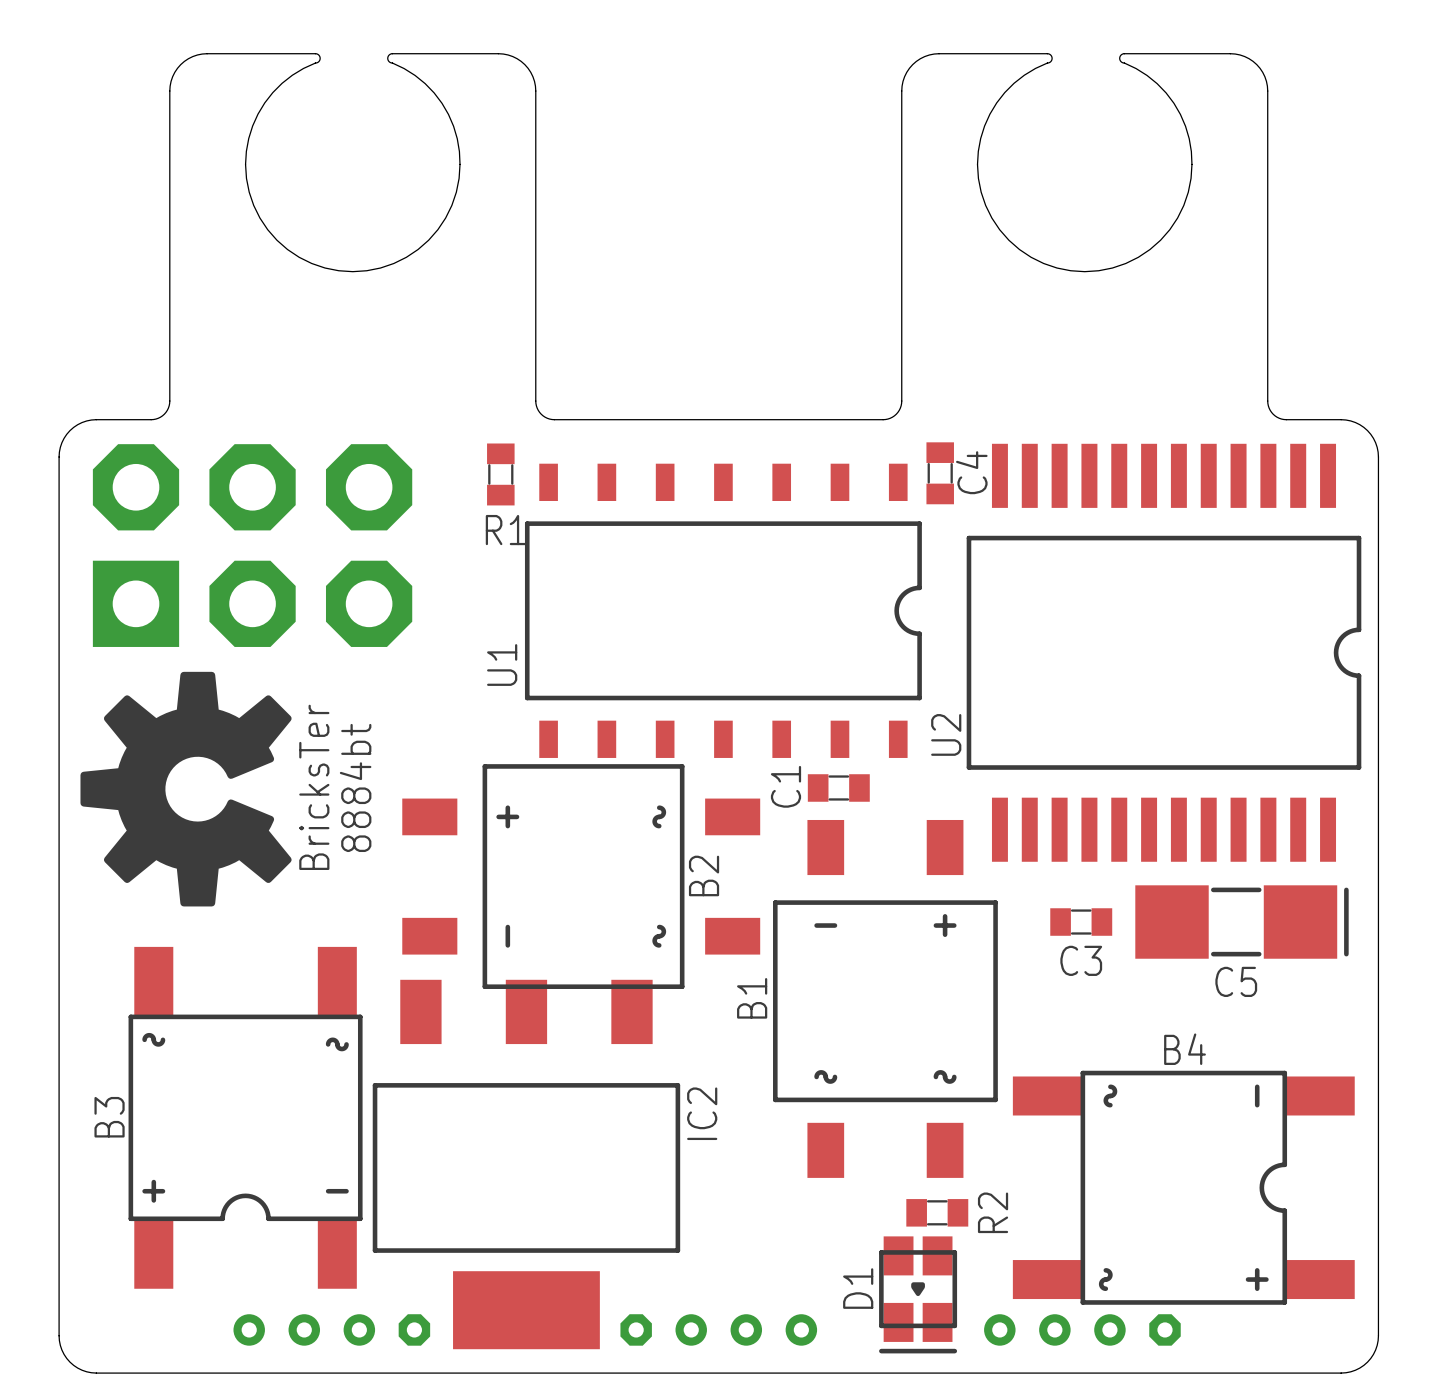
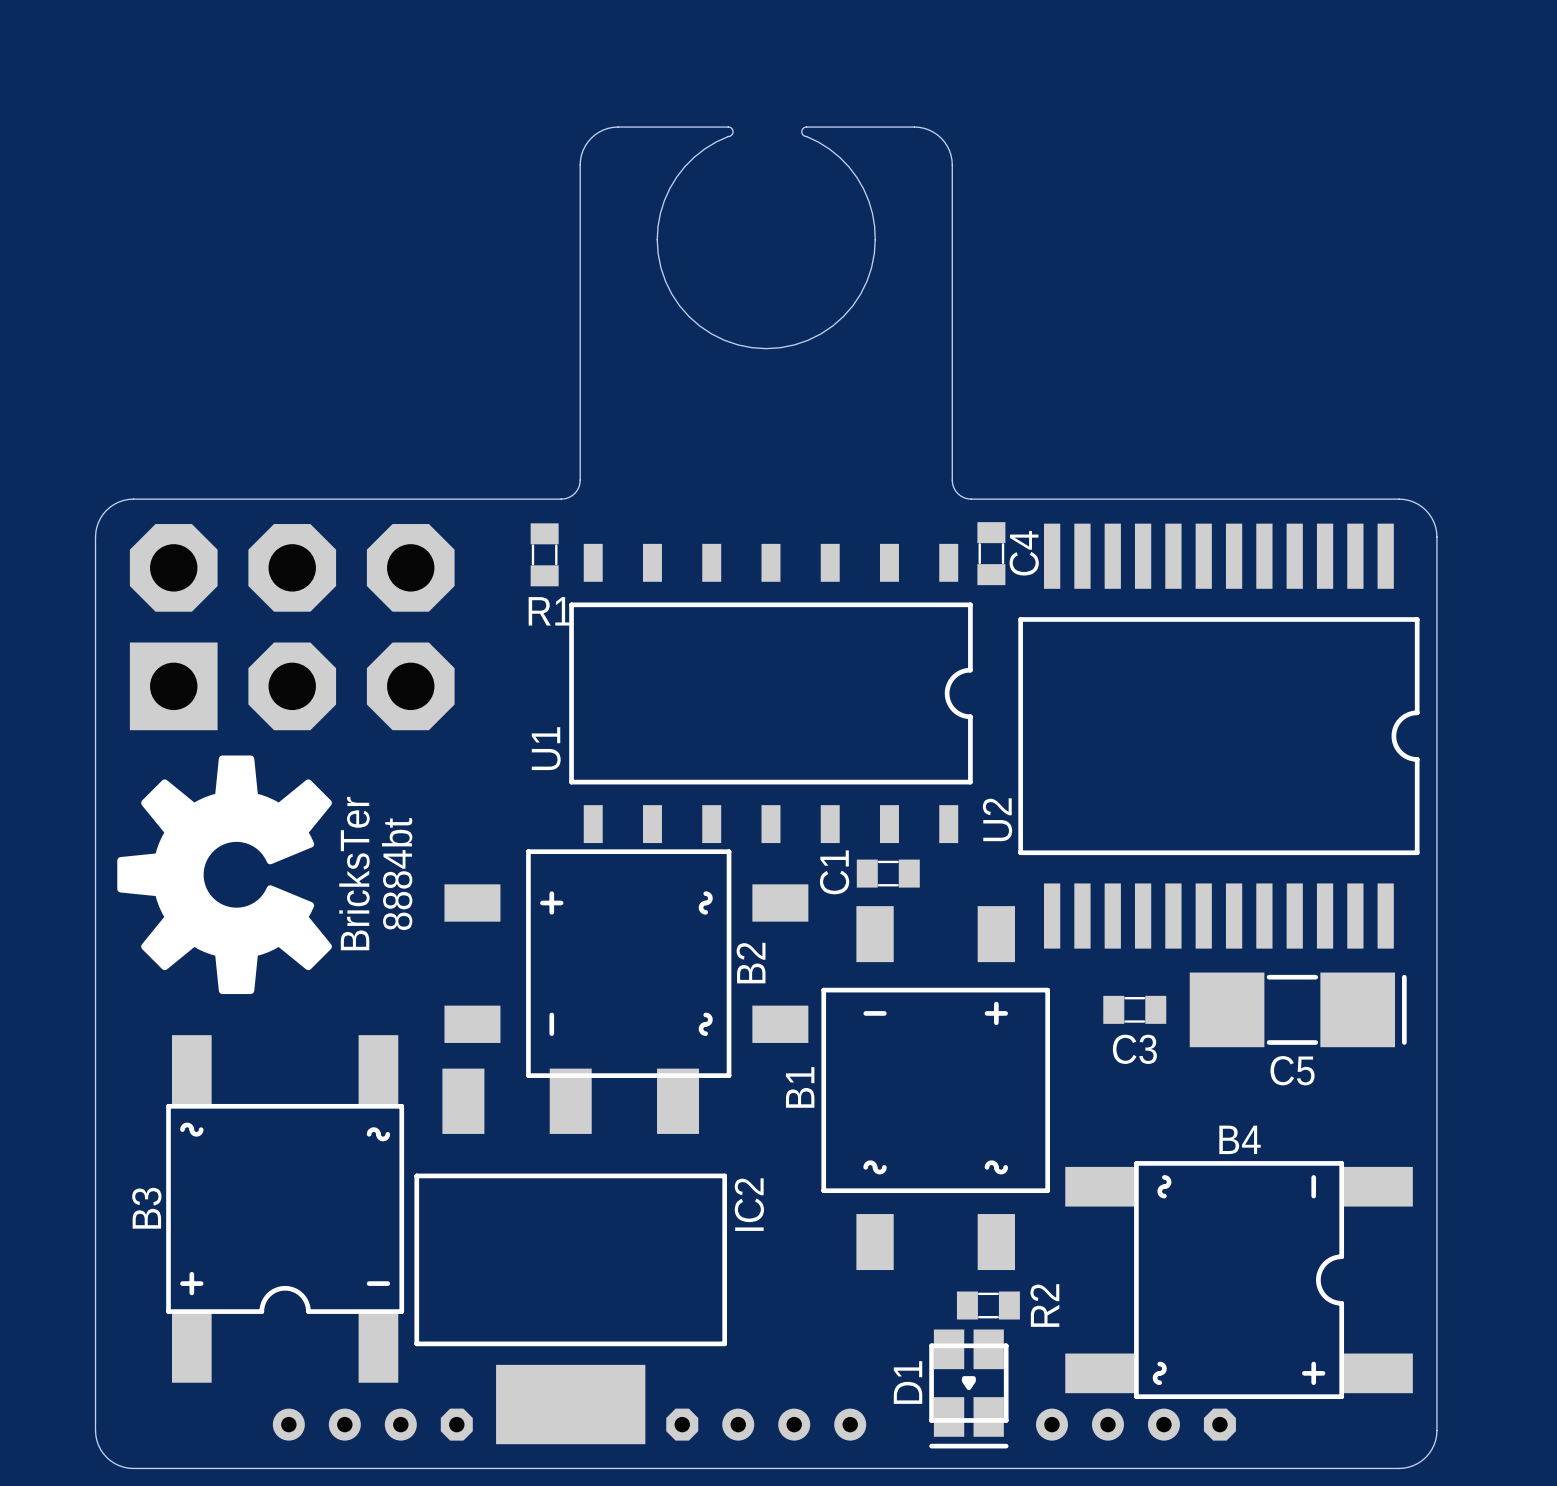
board edge: (535, 91) (534, 81) (528, 68) (517, 58) (508, 54) (389, 55) (387, 58) (389, 62) (404, 68) (425, 83) (434, 92) (448, 114) (457, 138) (459, 151) (459, 178) (456, 192) (451, 205) (437, 229) (418, 249) (393, 263) (380, 268) (352, 271) (338, 270) (311, 263) (287, 249) (276, 240) (267, 229) (253, 205) (246, 178) (246, 151) (252, 126) (258, 114) (272, 92) (282, 83) (303, 68) (318, 62) (319, 55) (315, 53) (207, 53) (197, 54) (184, 61) (174, 72) (169, 91) (169, 403) (164, 414) (151, 419) -> (580, 480) (574, 493) (561, 499) (189, 499)
board edge: none -> (580, 164) (581, 155) (588, 141) (599, 132) (608, 128) (731, 128) (733, 131) (731, 135) (716, 142) (694, 157) (684, 166) (669, 188) (664, 200) (658, 226) (658, 253) (665, 281) (679, 305) (689, 316) (699, 326) (724, 340) (738, 344) (766, 348) (794, 344) (807, 340) (832, 326) (843, 316) (852, 305) (866, 281) (874, 253) (874, 226) (872, 213) (863, 188) (848, 166) (839, 157) (818, 142) (803, 135) (801, 131) (803, 128) (924, 128) (933, 132) (944, 141) (950, 155) (952, 164)
board edge: (901, 91) (903, 81) (909, 68) (920, 58) (929, 54) (1050, 55) (1052, 58) (1050, 62) (1035, 68) (1014, 83) (1004, 92) (989, 114) (984, 126) (978, 151) (978, 178) (981, 192) (985, 205) (999, 229) (1019, 249) (1043, 263) (1056, 268) (1084, 271) (1098, 270) (1125, 263) (1150, 249) (1160, 240) (1169, 229) (1183, 205) (1191, 178) (1191, 151) (1189, 138) (1180, 114) (1166, 92) (1157, 83) (1136, 68) (1121, 62) (1120, 55) (1124, 53) (1230, 53) (1240, 54) (1253, 61) (1262, 72) (1267, 91) (1267, 403) (1273, 414) (1286, 419) -> (952, 480) (957, 493) (971, 499) (1343, 499)
board edge: (535, 401) (541, 414) (554, 419) (883, 419) (896, 414) (901, 401) -> none

